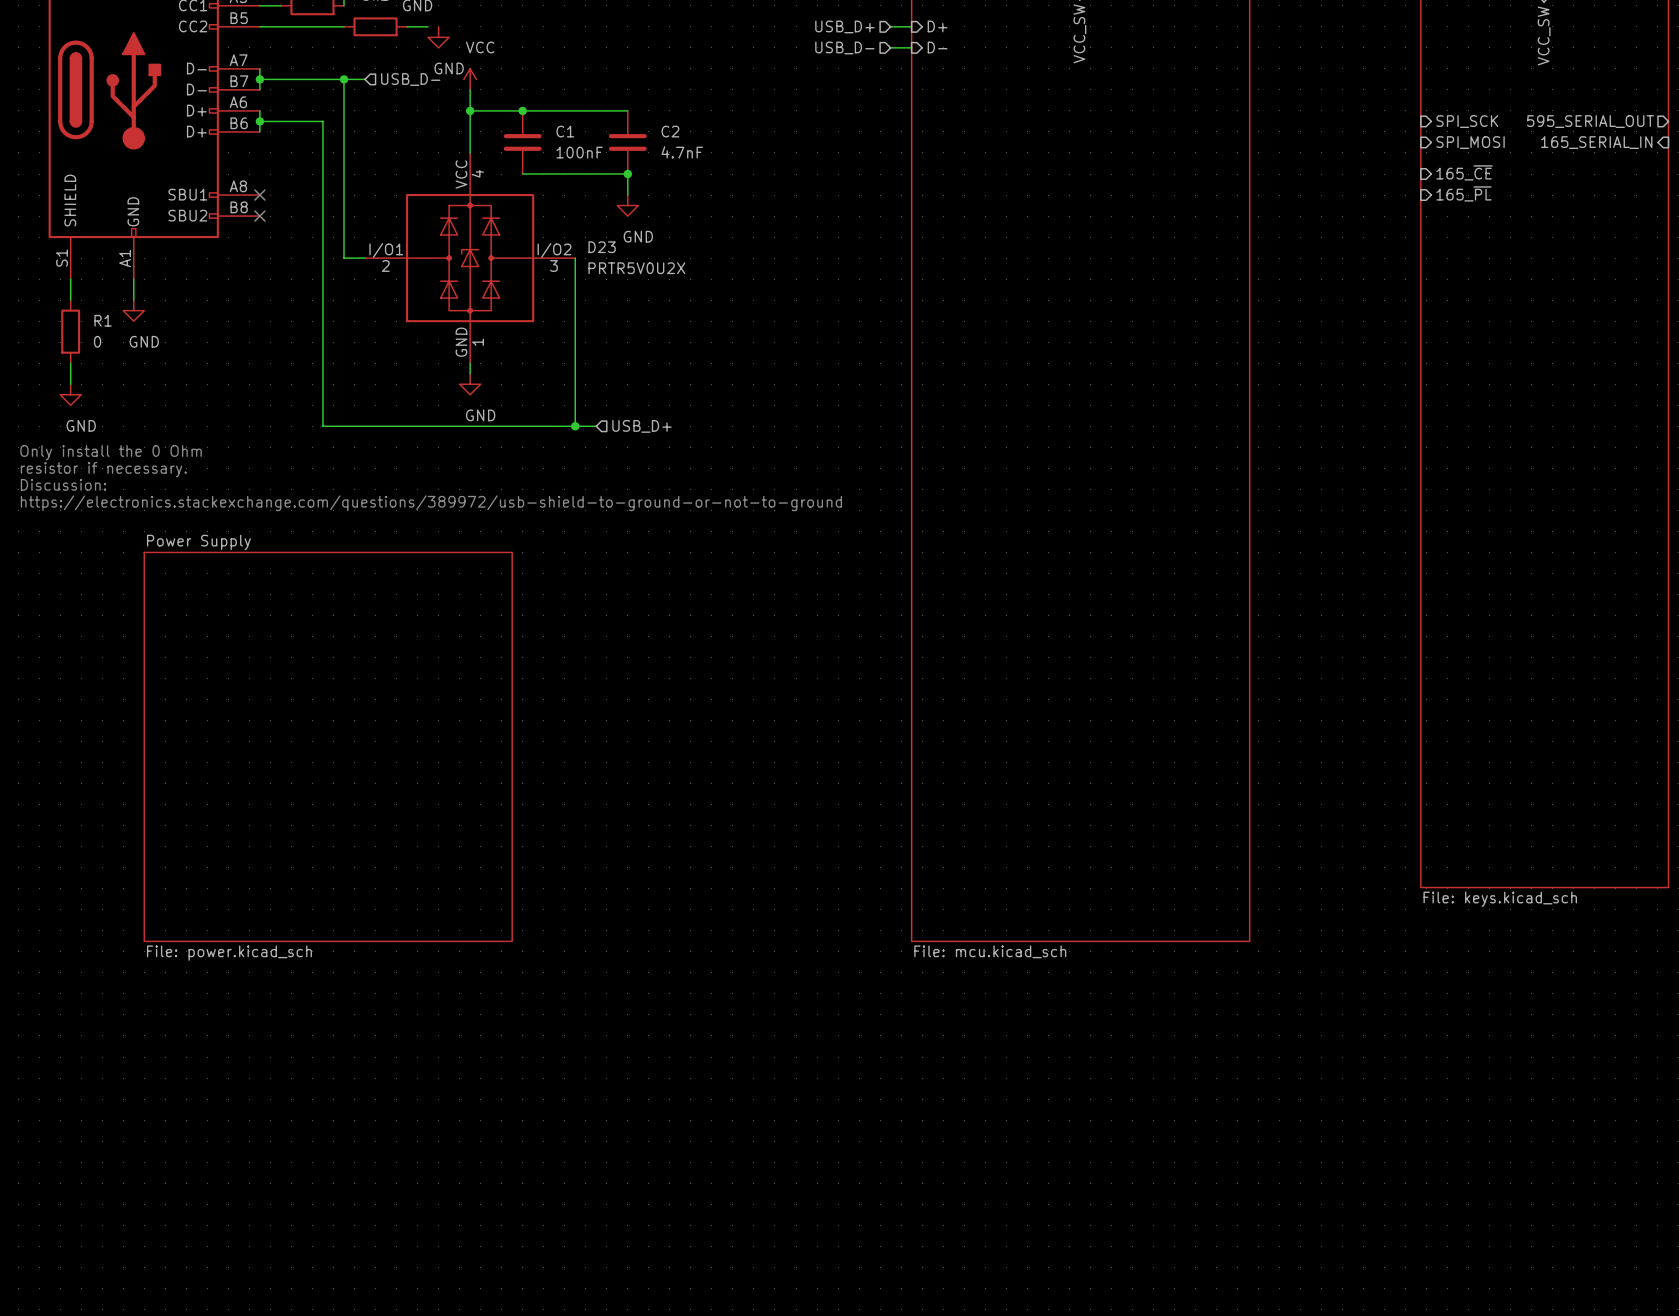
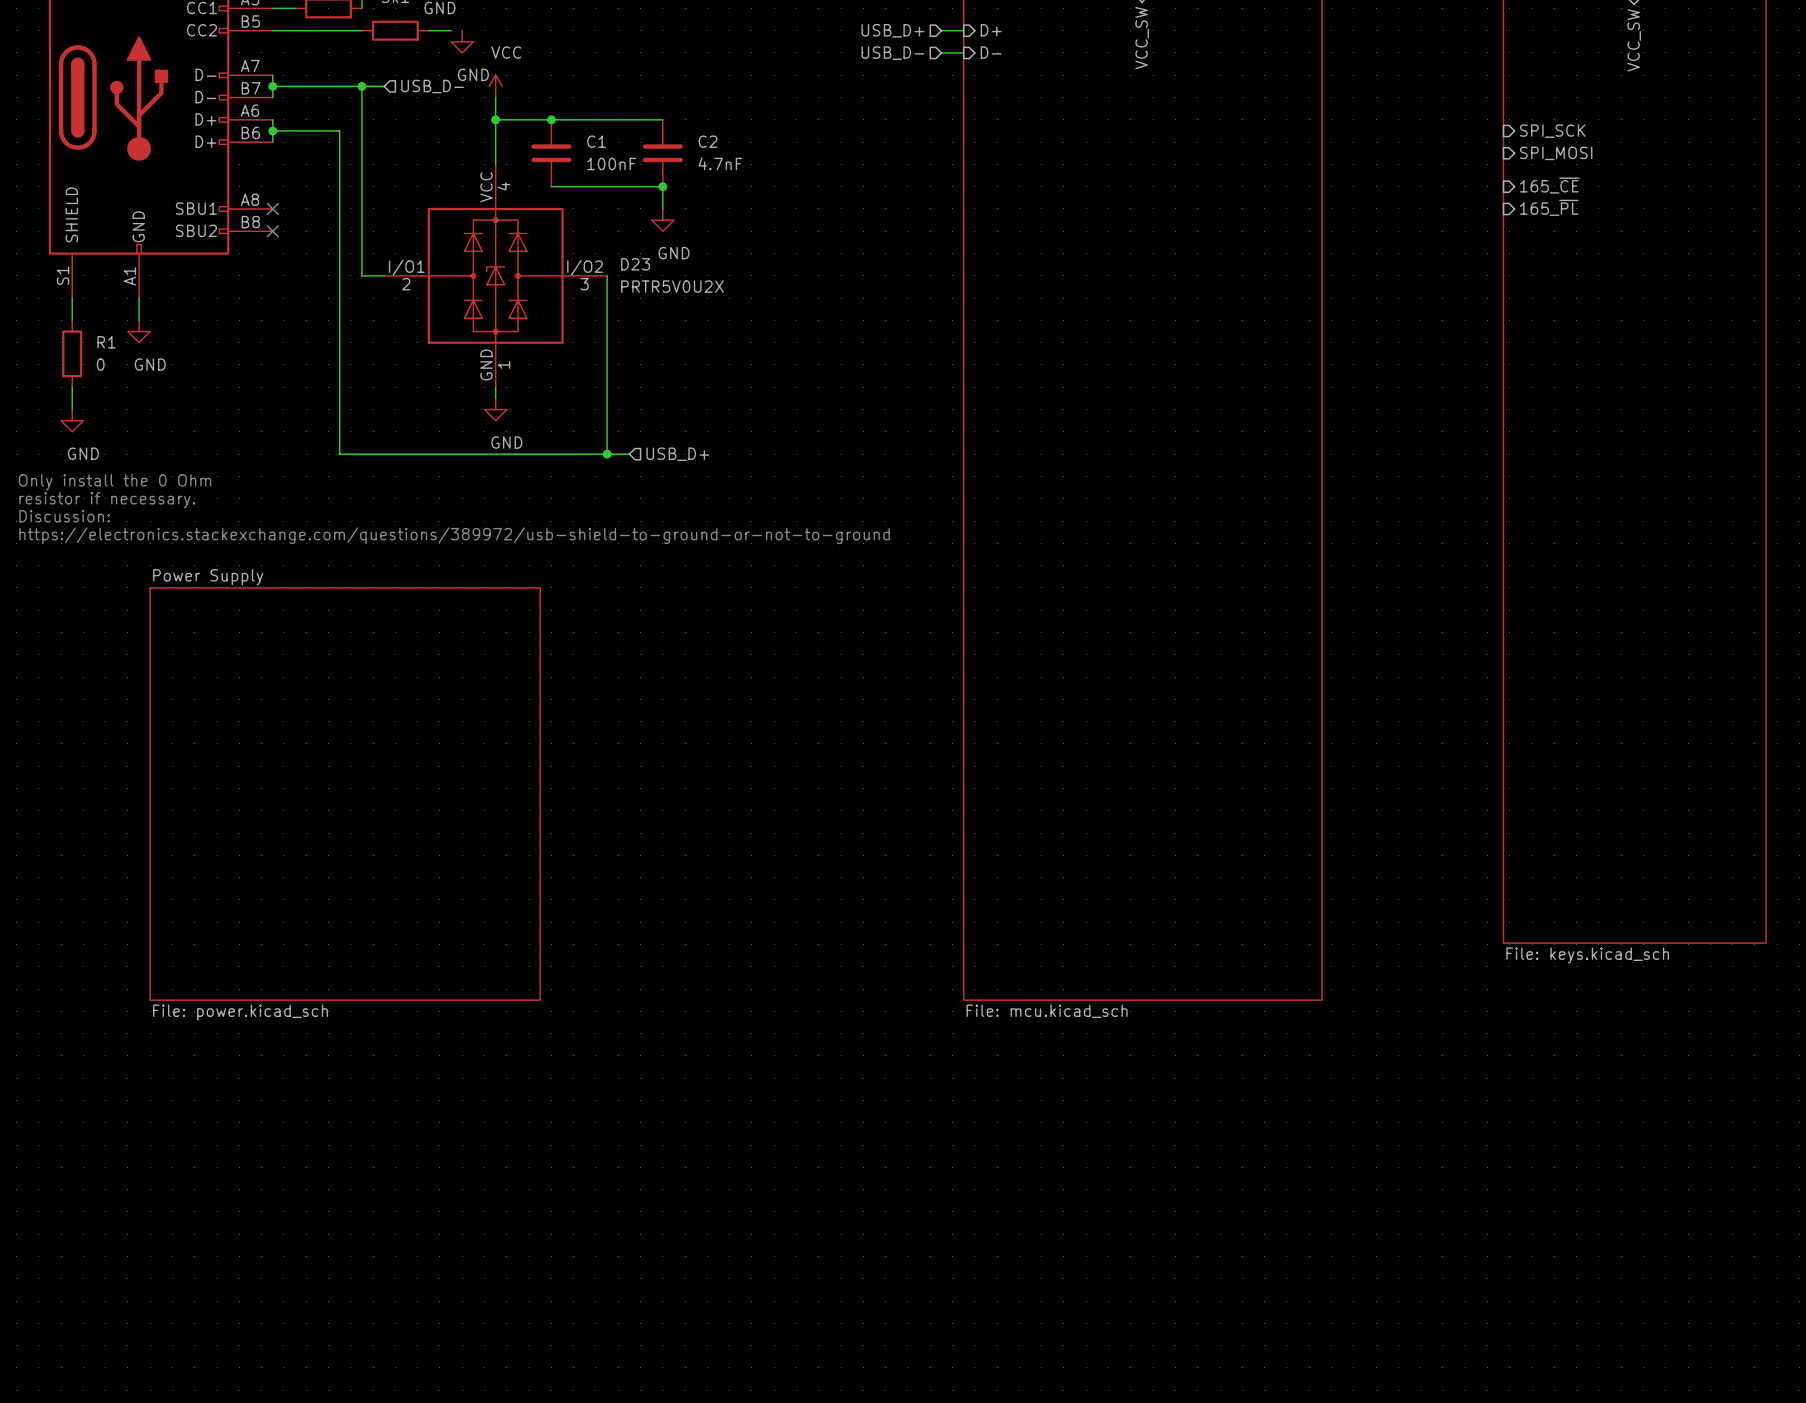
sheet pin: 595_SERIAL_OUT (1590, 121) -> none
sheet pin: 165_SERIAL_IN (1596, 142) -> none

